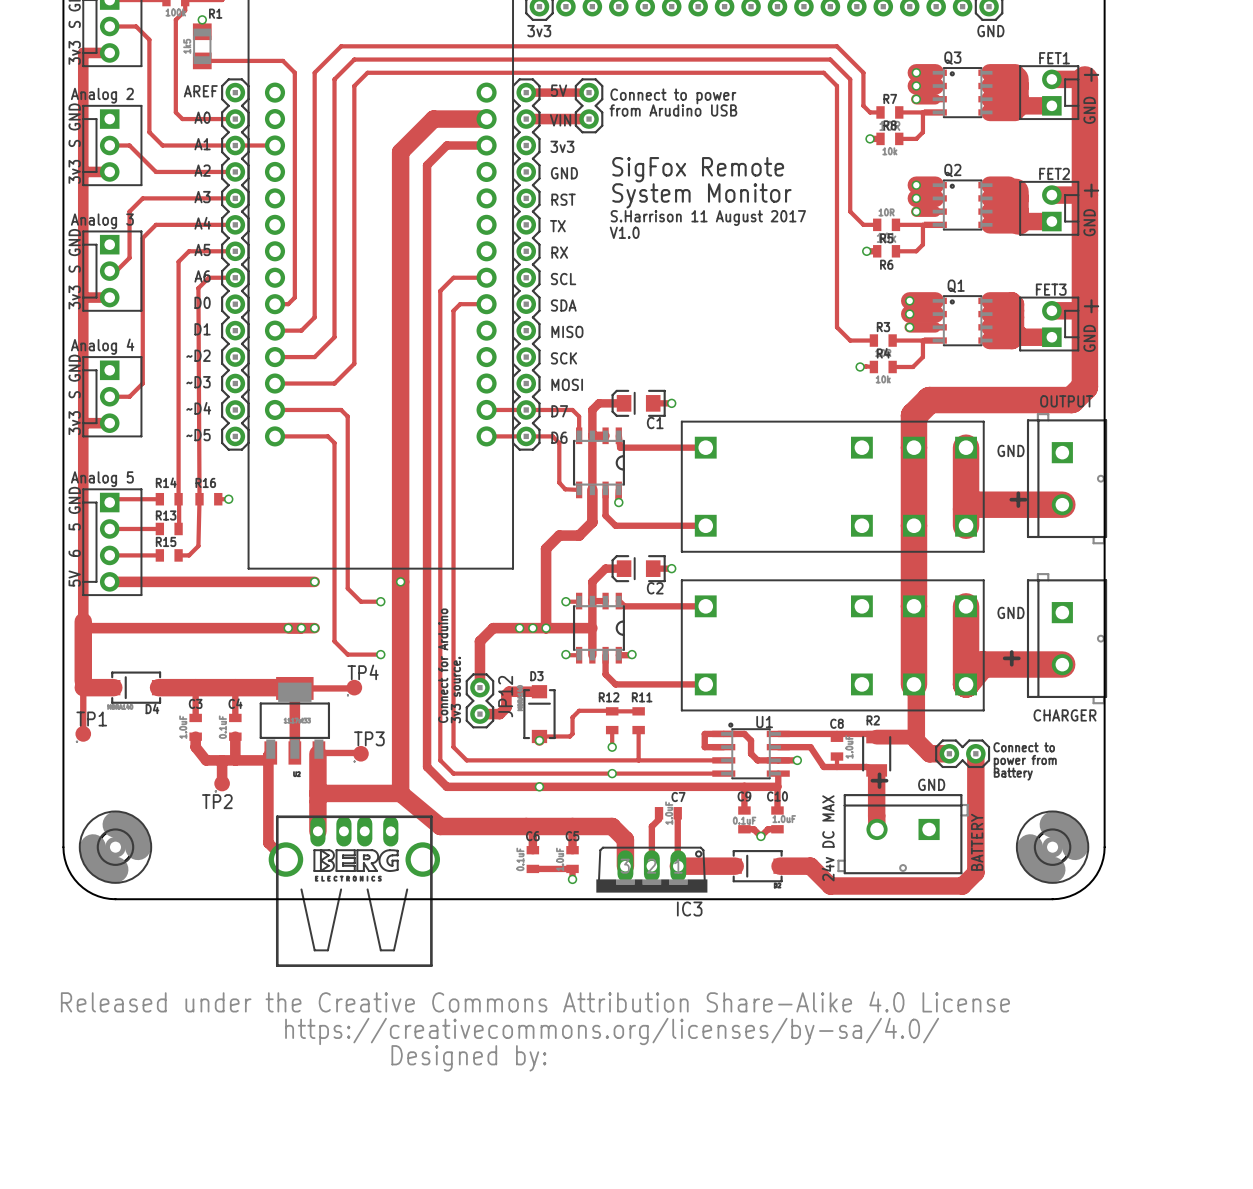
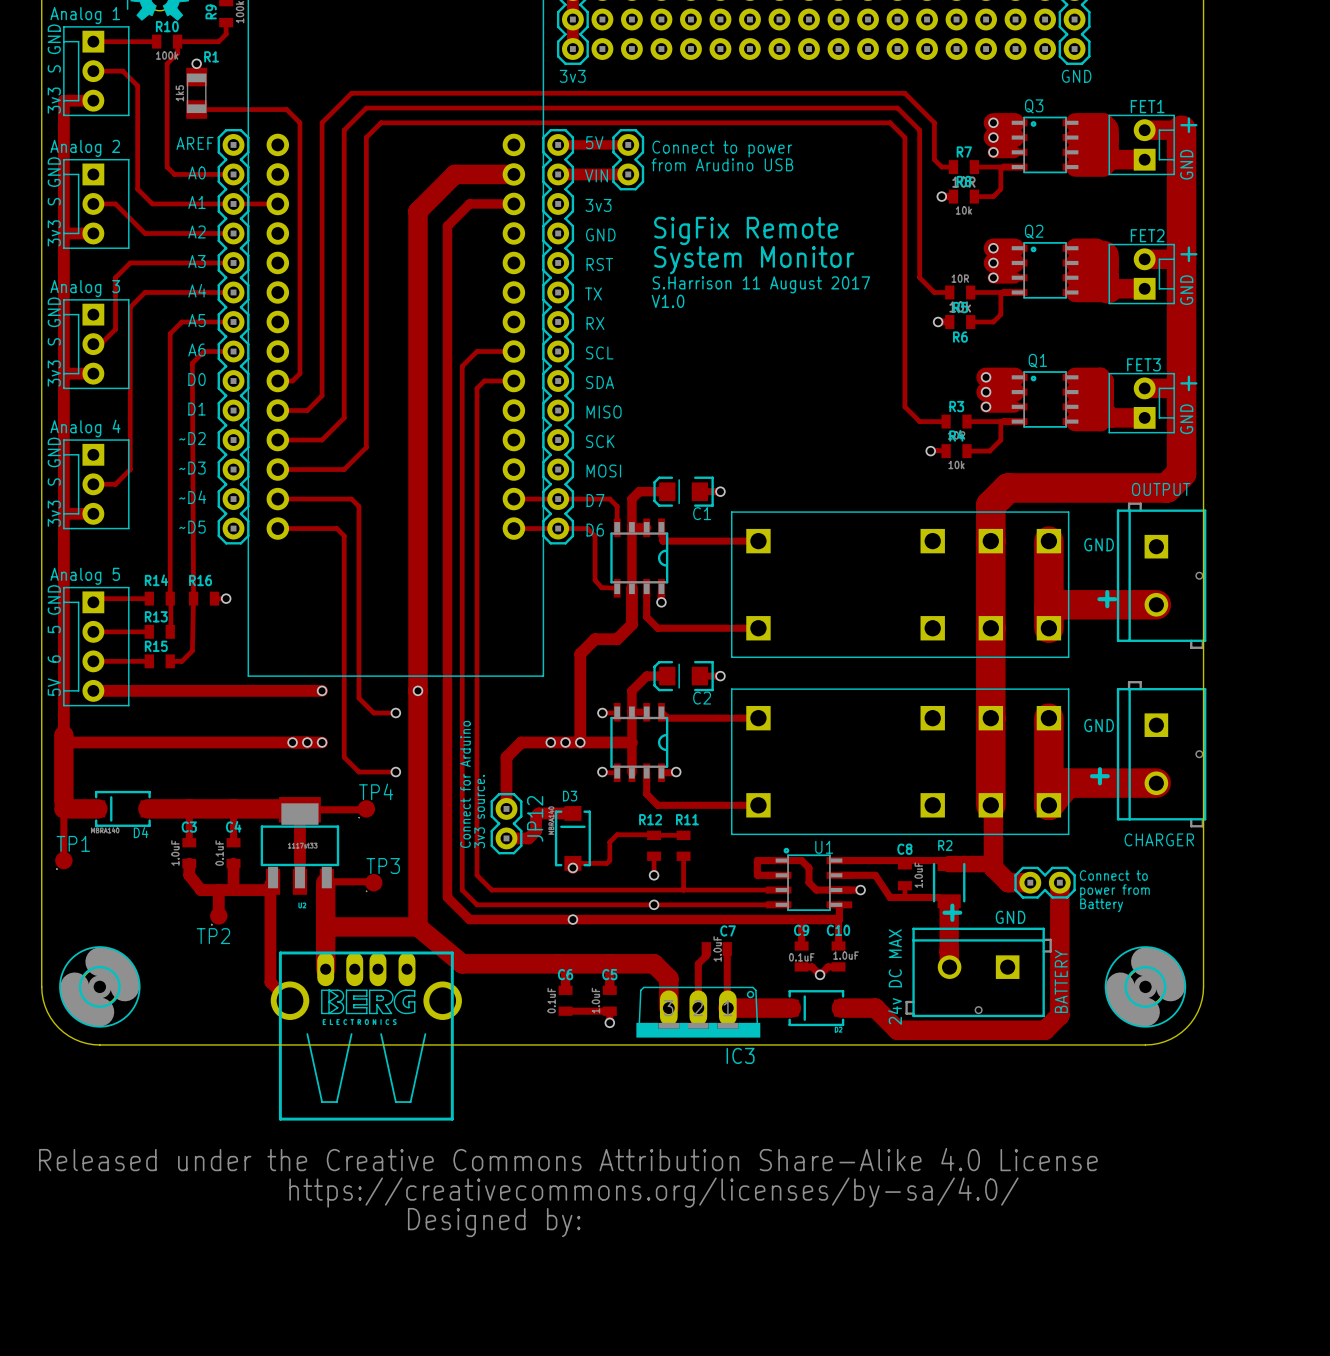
text: SigFox Remote (698, 169) -> SigFix Remote (746, 230)

